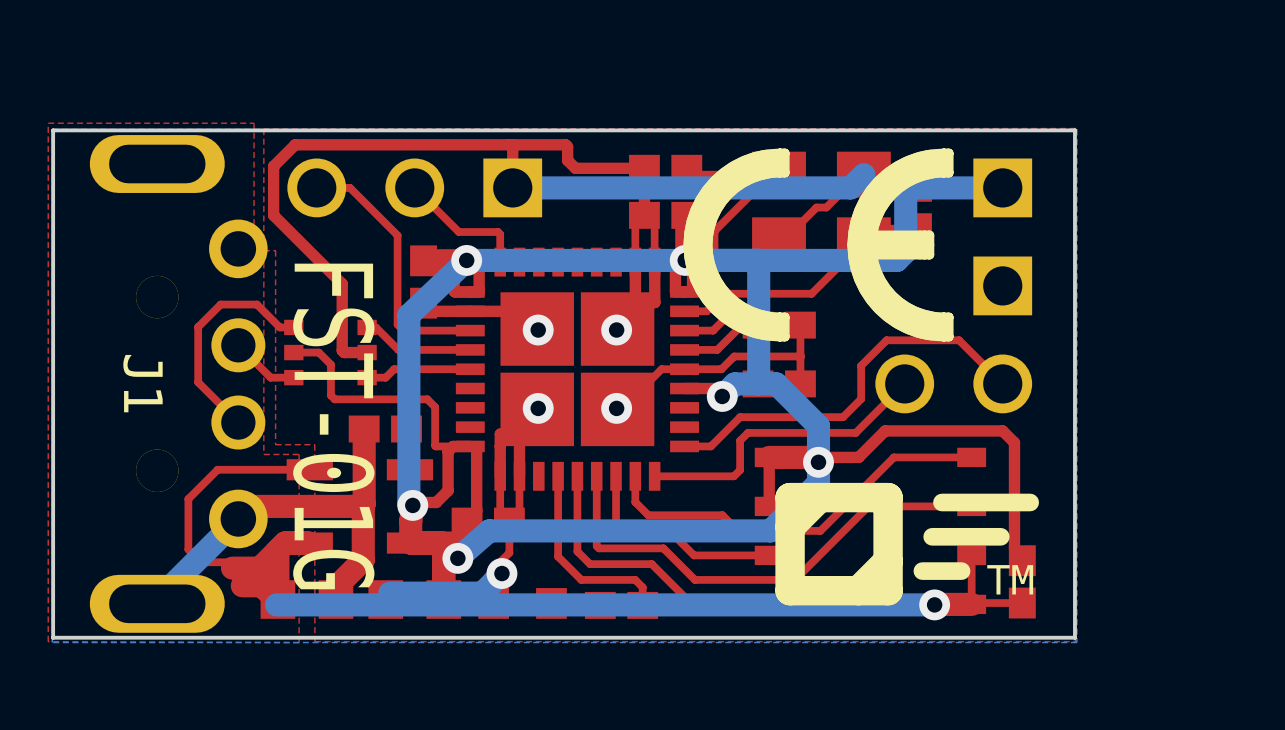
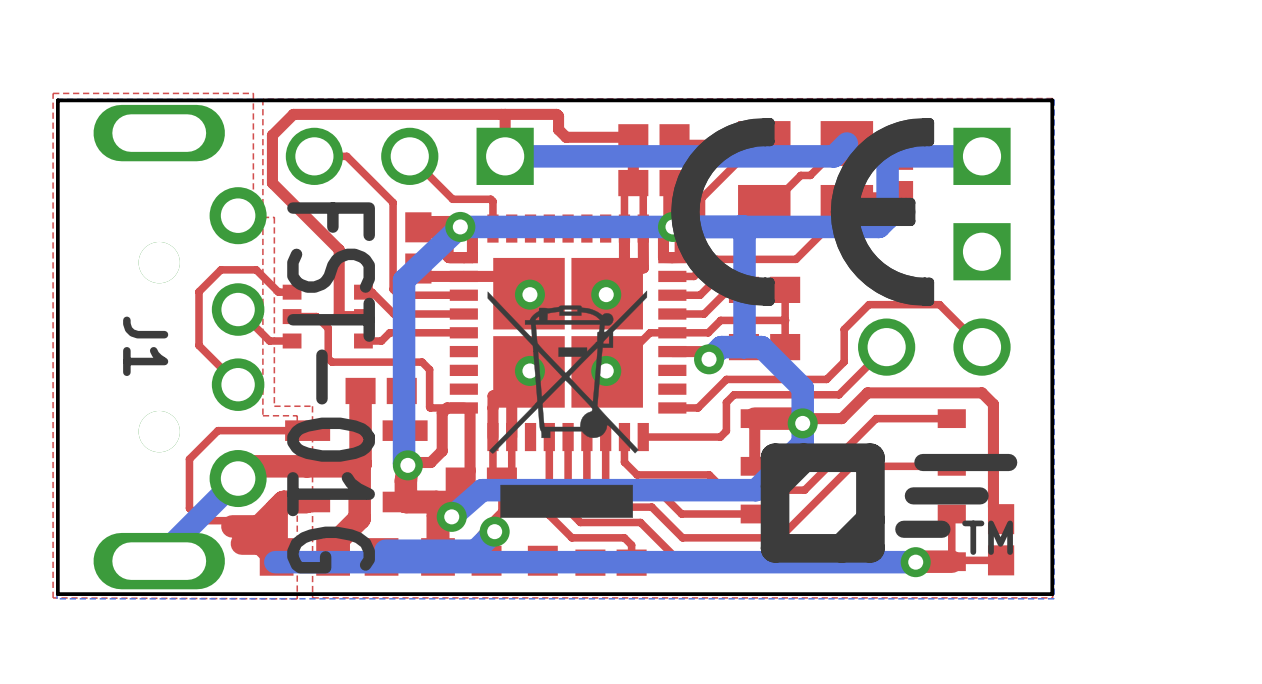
drawing: none -> [487, 290, 648, 518]

